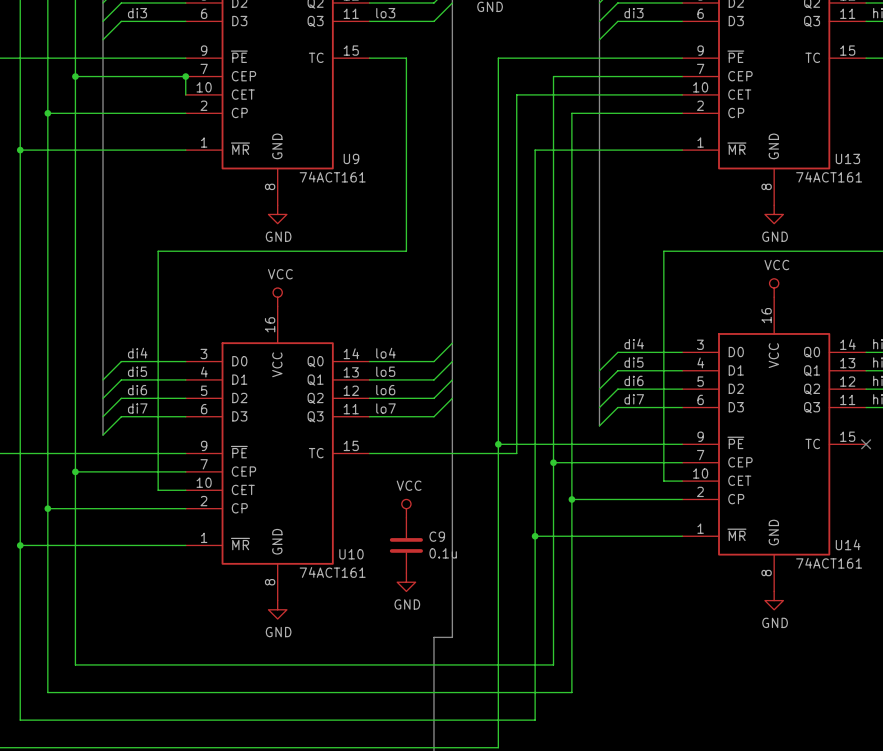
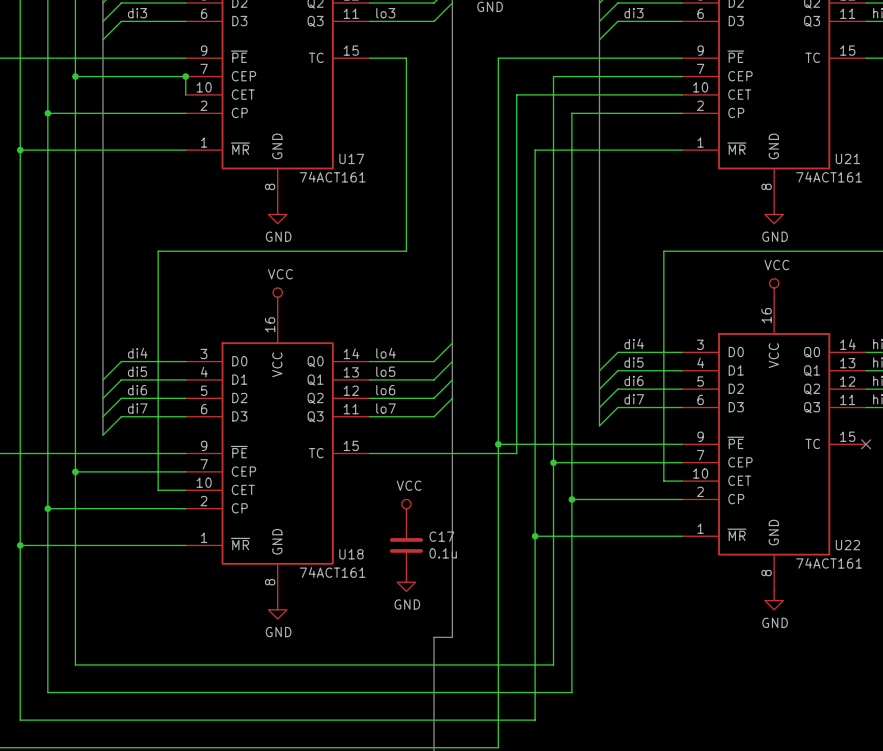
U9 name: U9 (351, 158) -> U17 (351, 158)
U13 name: U13 (847, 158) -> U21 (847, 158)
C9 name: C9 (437, 536) -> C17 (441, 536)
U14 name: U14 (848, 544) -> U22 (847, 545)
U10 name: U10 (351, 554) -> U18 (351, 554)

